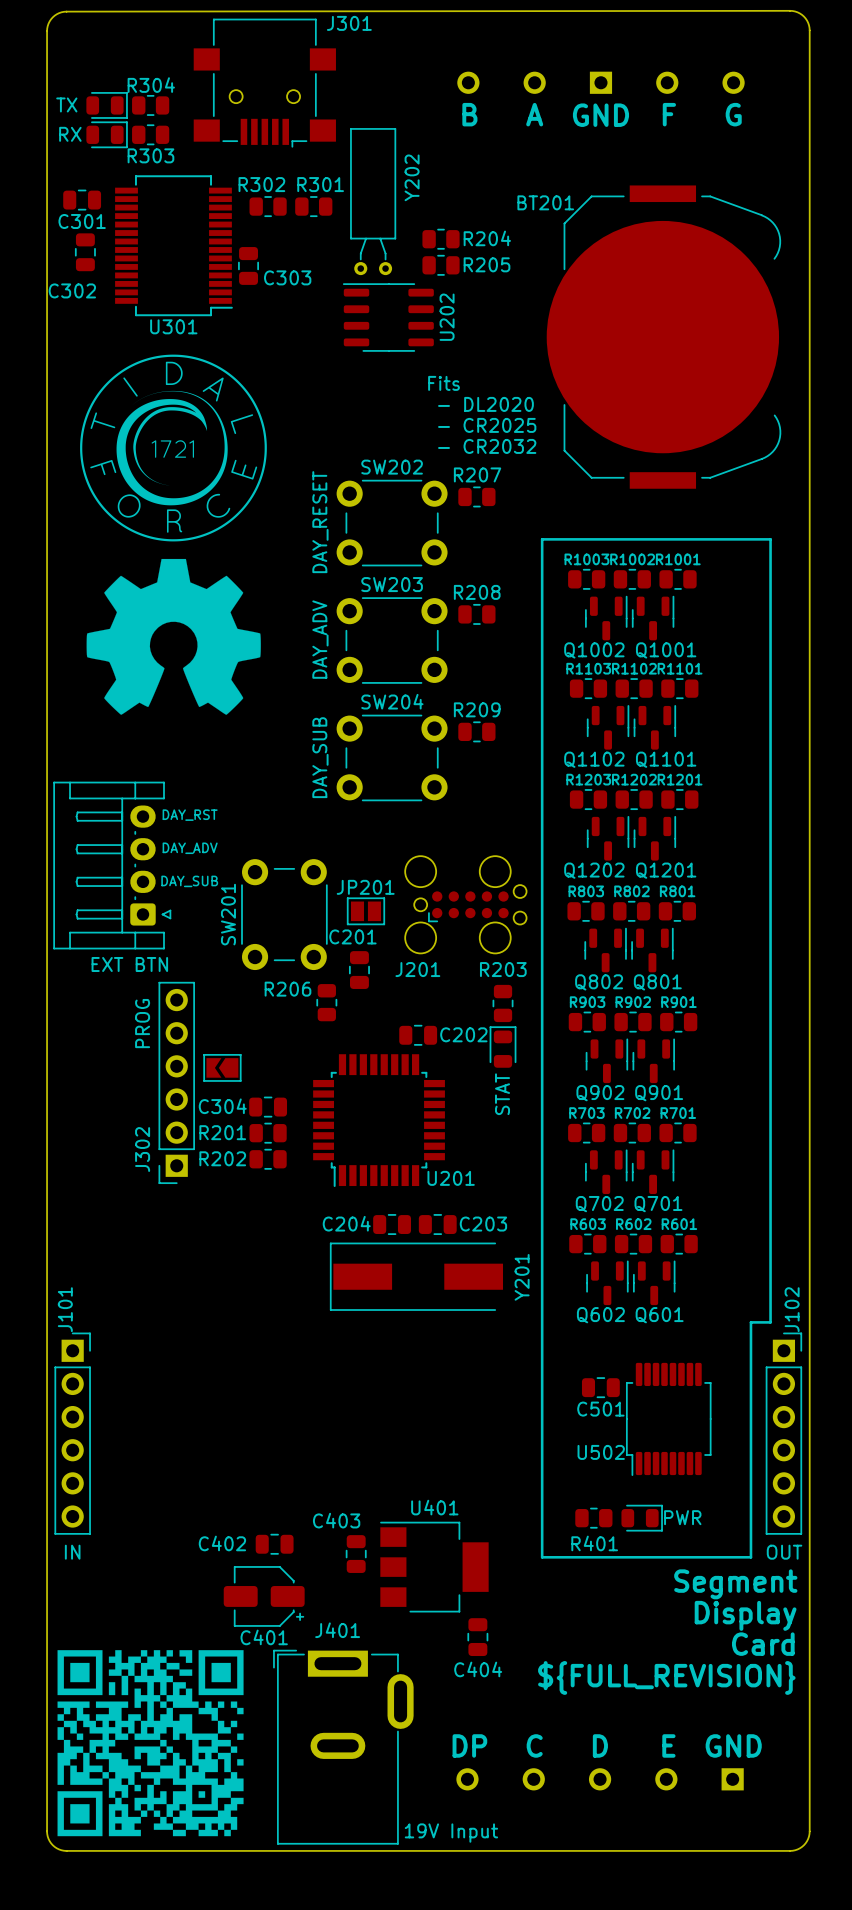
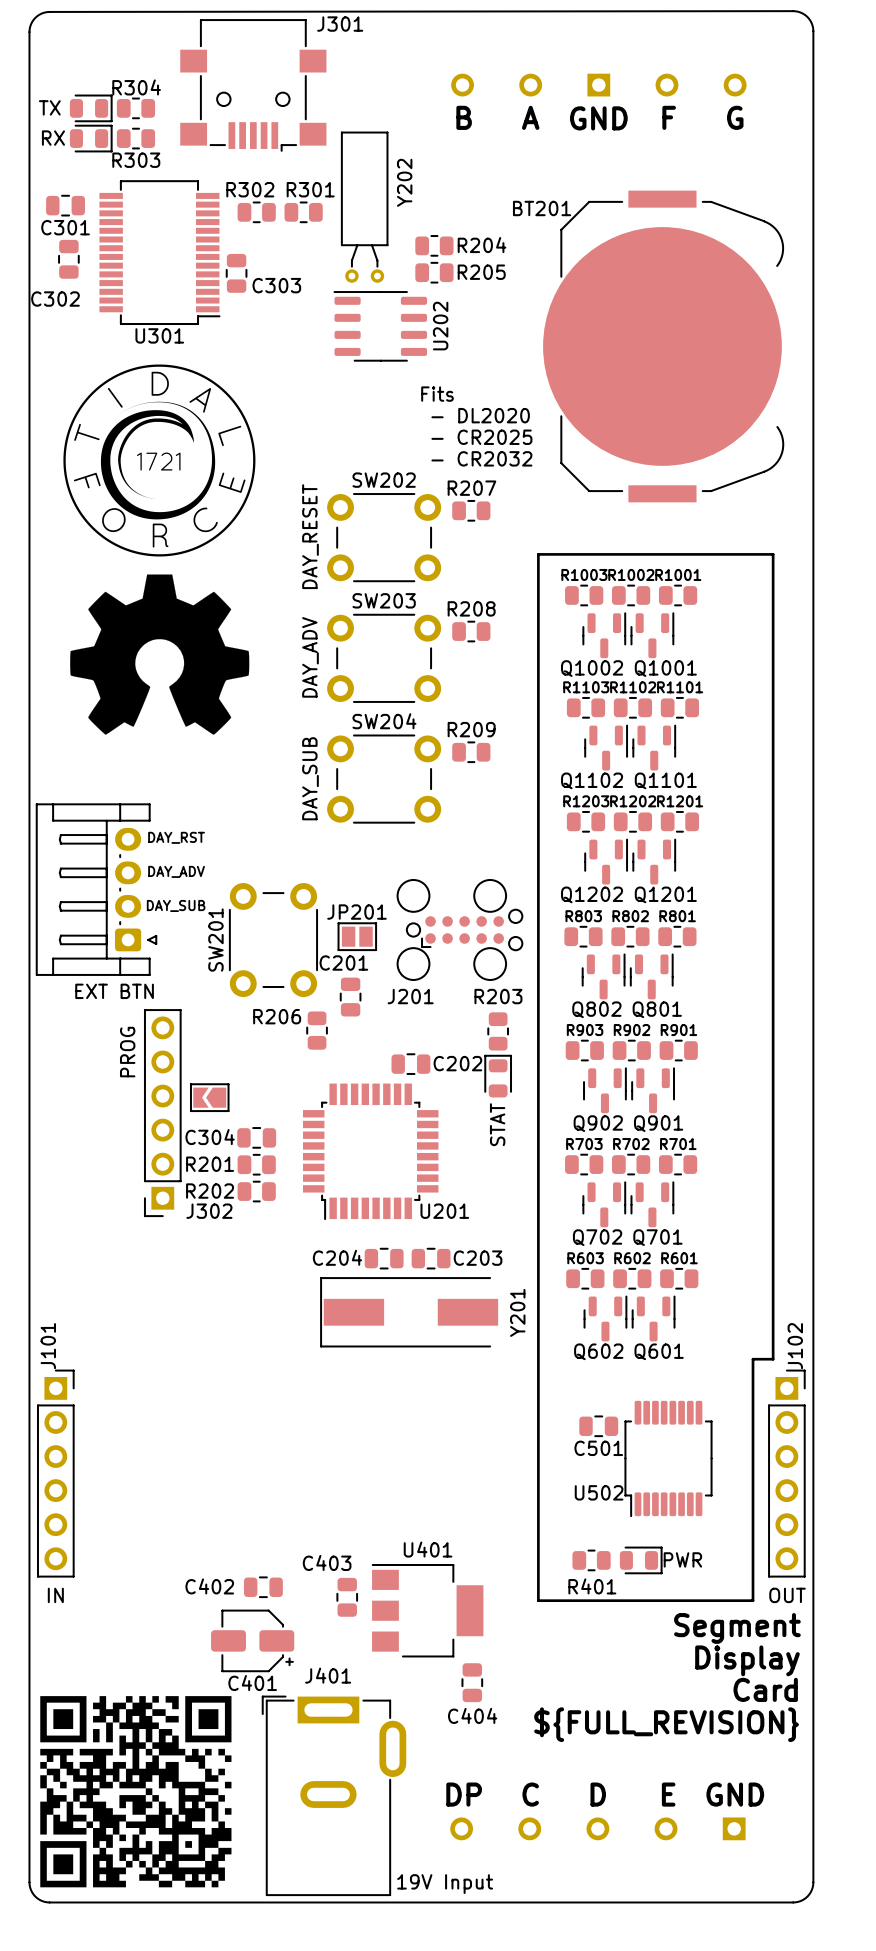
J302 name rotation: 0° (142, 1149) -> 90° clockwise (209, 1211)
J302 name position: J302 (142, 1149) -> J302 (209, 1211)

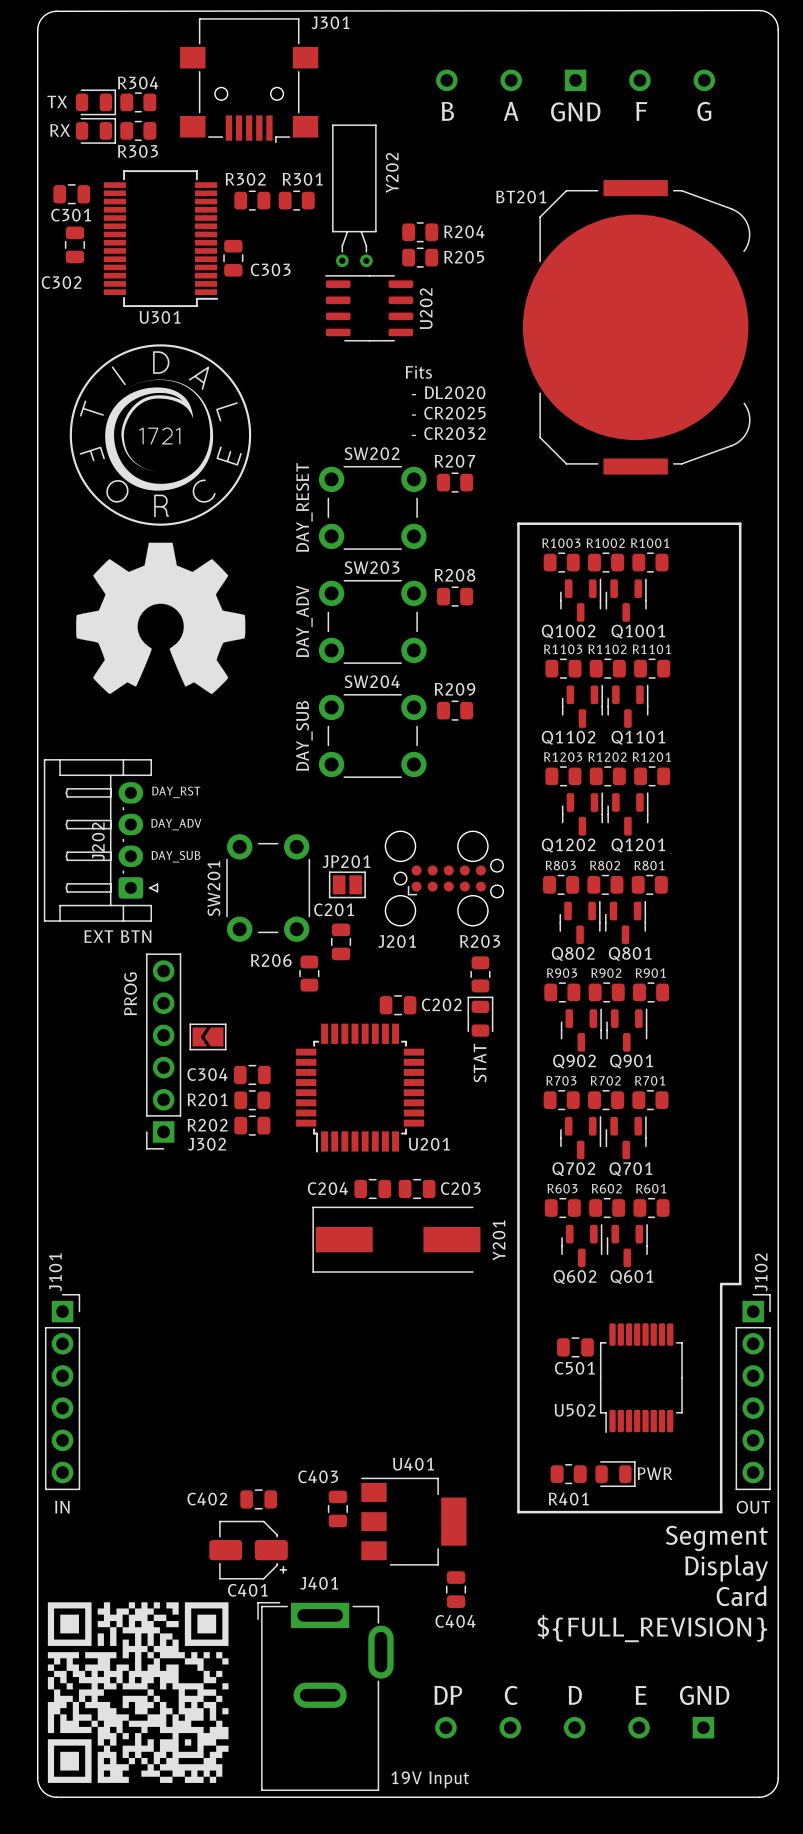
J202 name: none -> J202 (98, 841)

